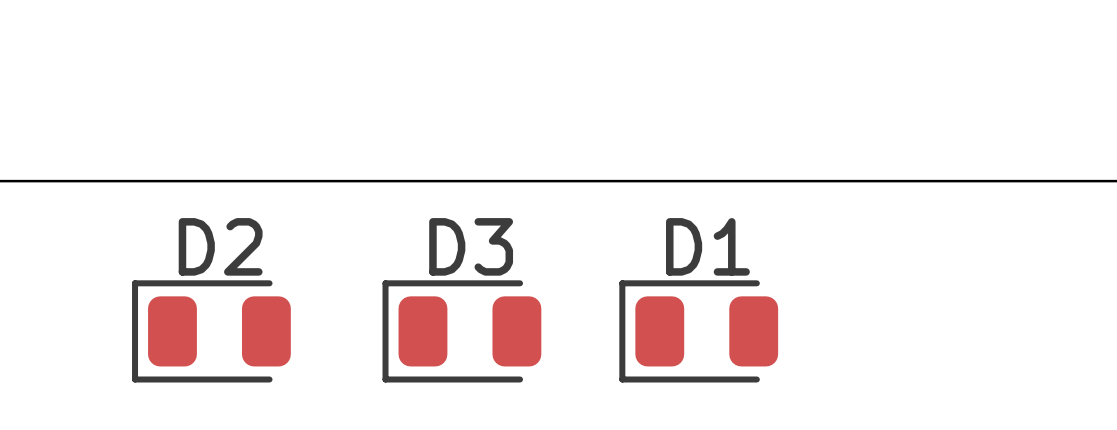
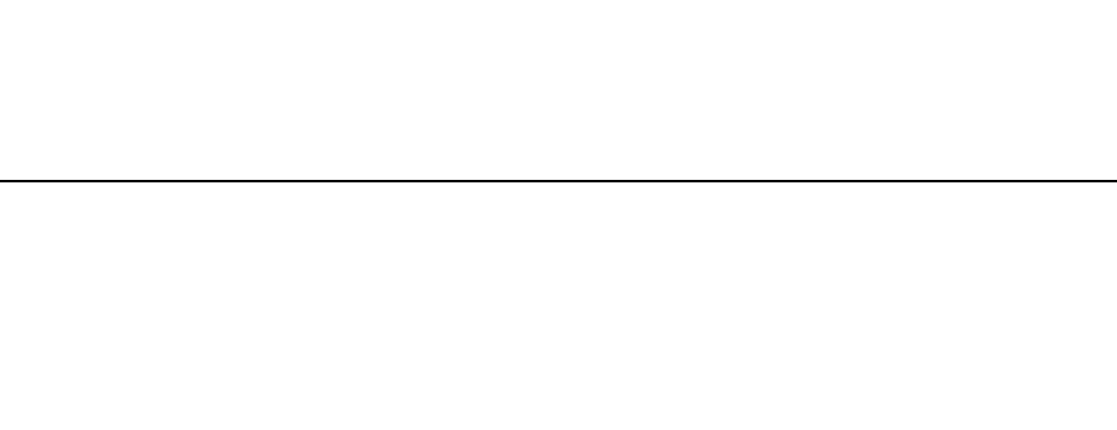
D2: (211, 331) -> none
D3: (461, 331) -> none
D1: (698, 331) -> none

